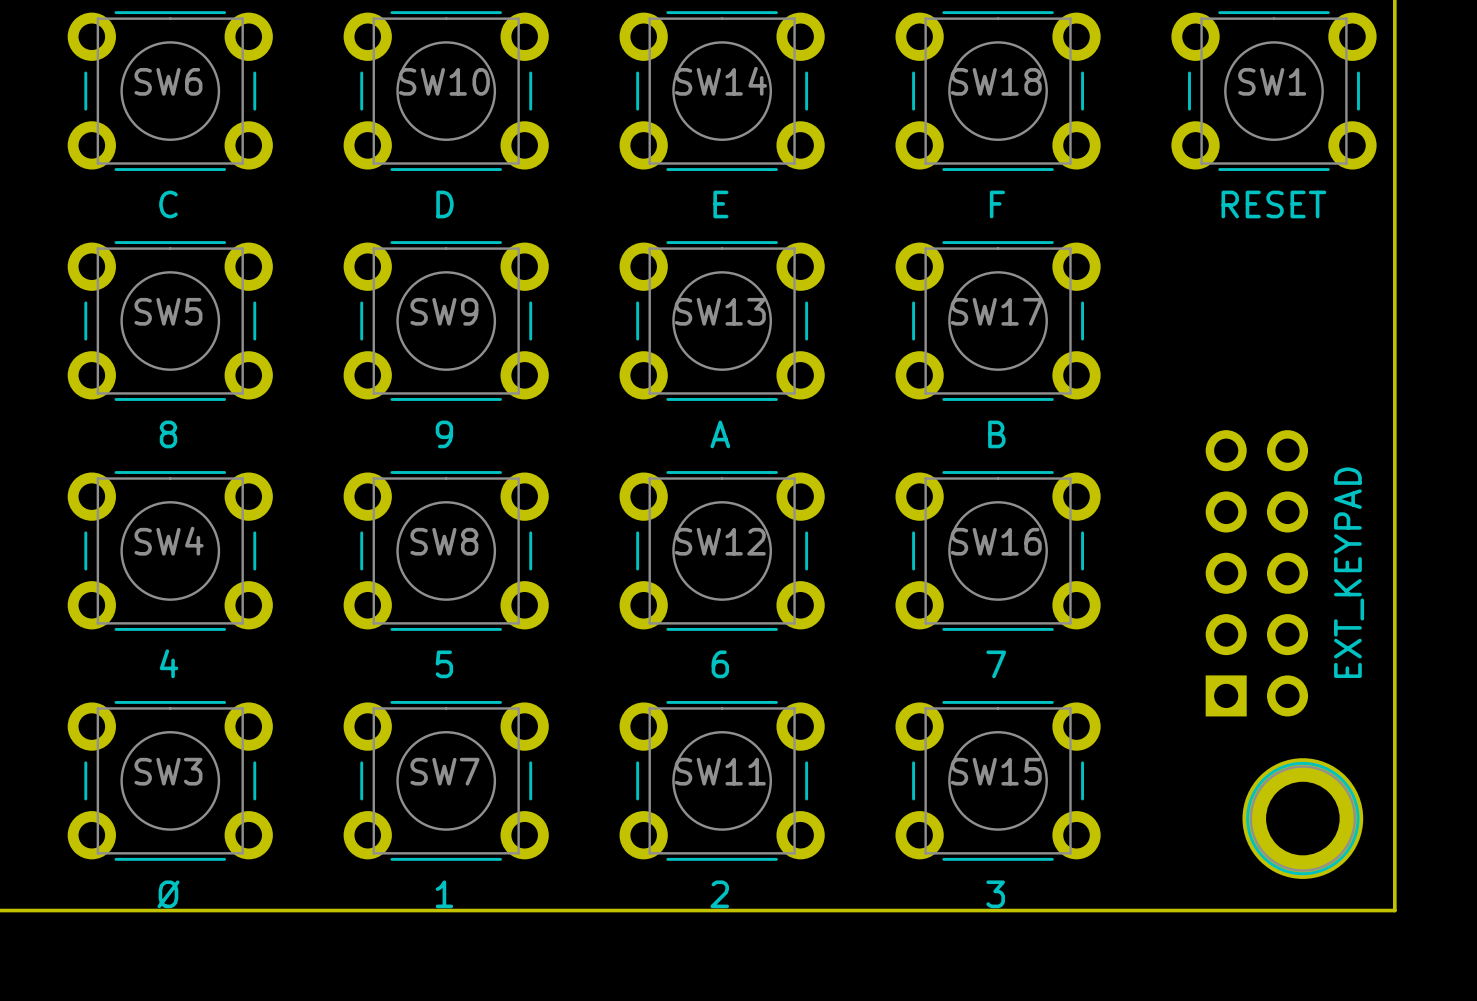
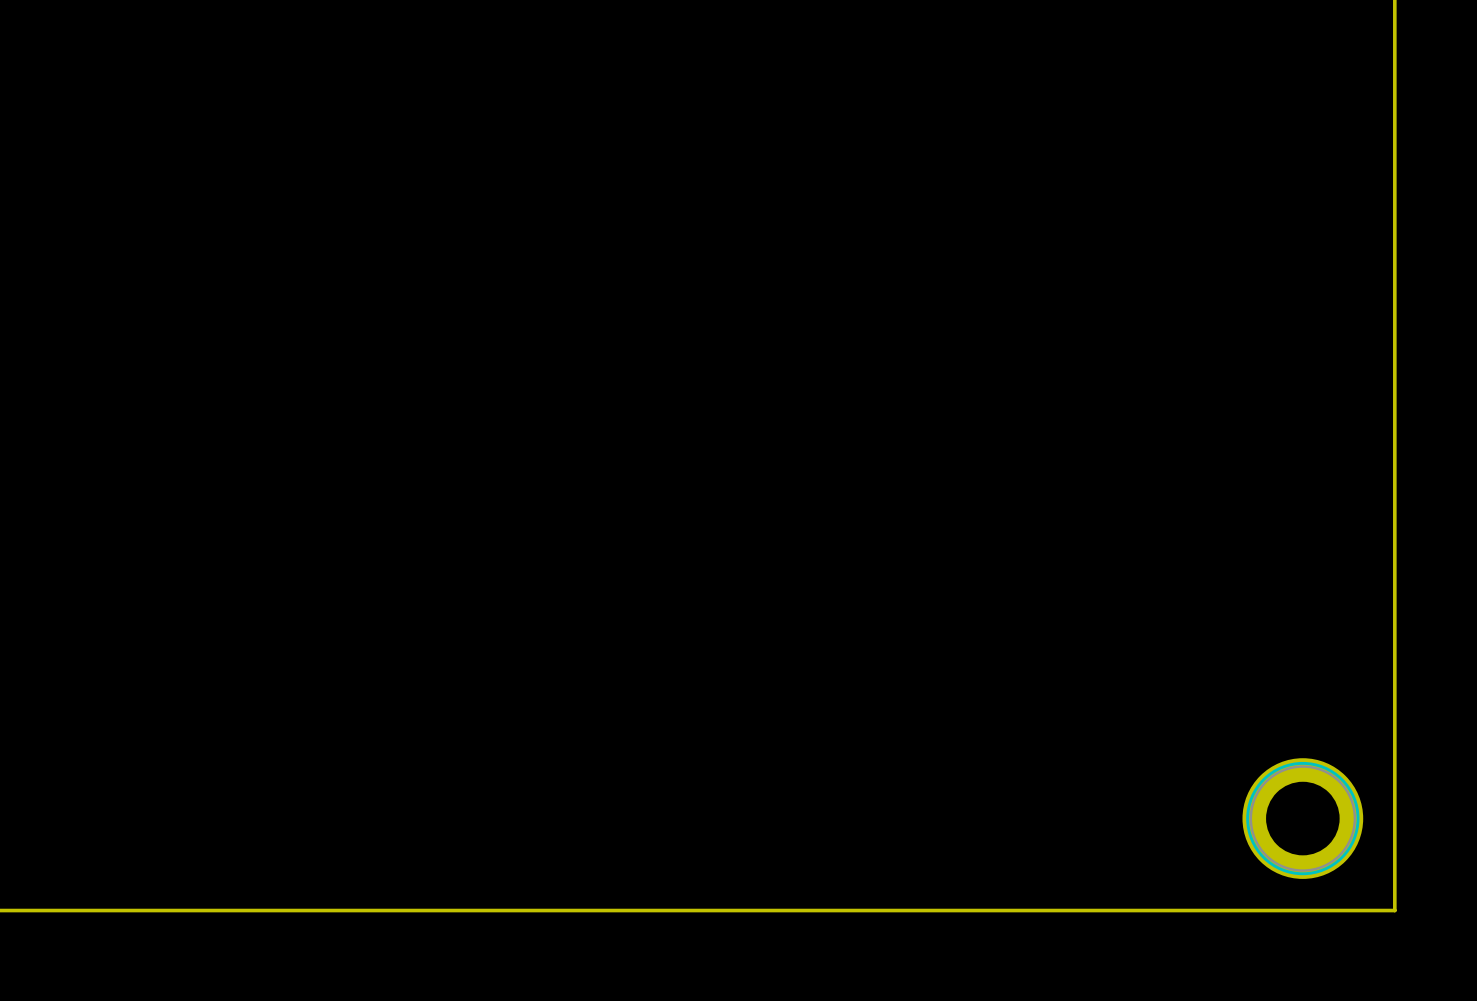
SW6: C (170, 91) -> none
SW10: D (446, 91) -> none
SW14: E (722, 91) -> none
SW18: F (998, 91) -> none
SW1: RESET (1273, 91) -> none
SW5: 8 (170, 321) -> none
SW9: 9 (446, 321) -> none
SW13: A (722, 321) -> none
SW17: B (998, 321) -> none
SW4: 4 (170, 550) -> none
SW8: 5 (446, 550) -> none
SW12: 6 (722, 550) -> none
SW16: 7 (998, 550) -> none
part: EXT_KEYPAD (1256, 573) -> none
SW3: Ø (170, 780) -> none
SW7: 1 (446, 780) -> none
SW11: 2 (722, 780) -> none
SW15: 3 (998, 780) -> none

